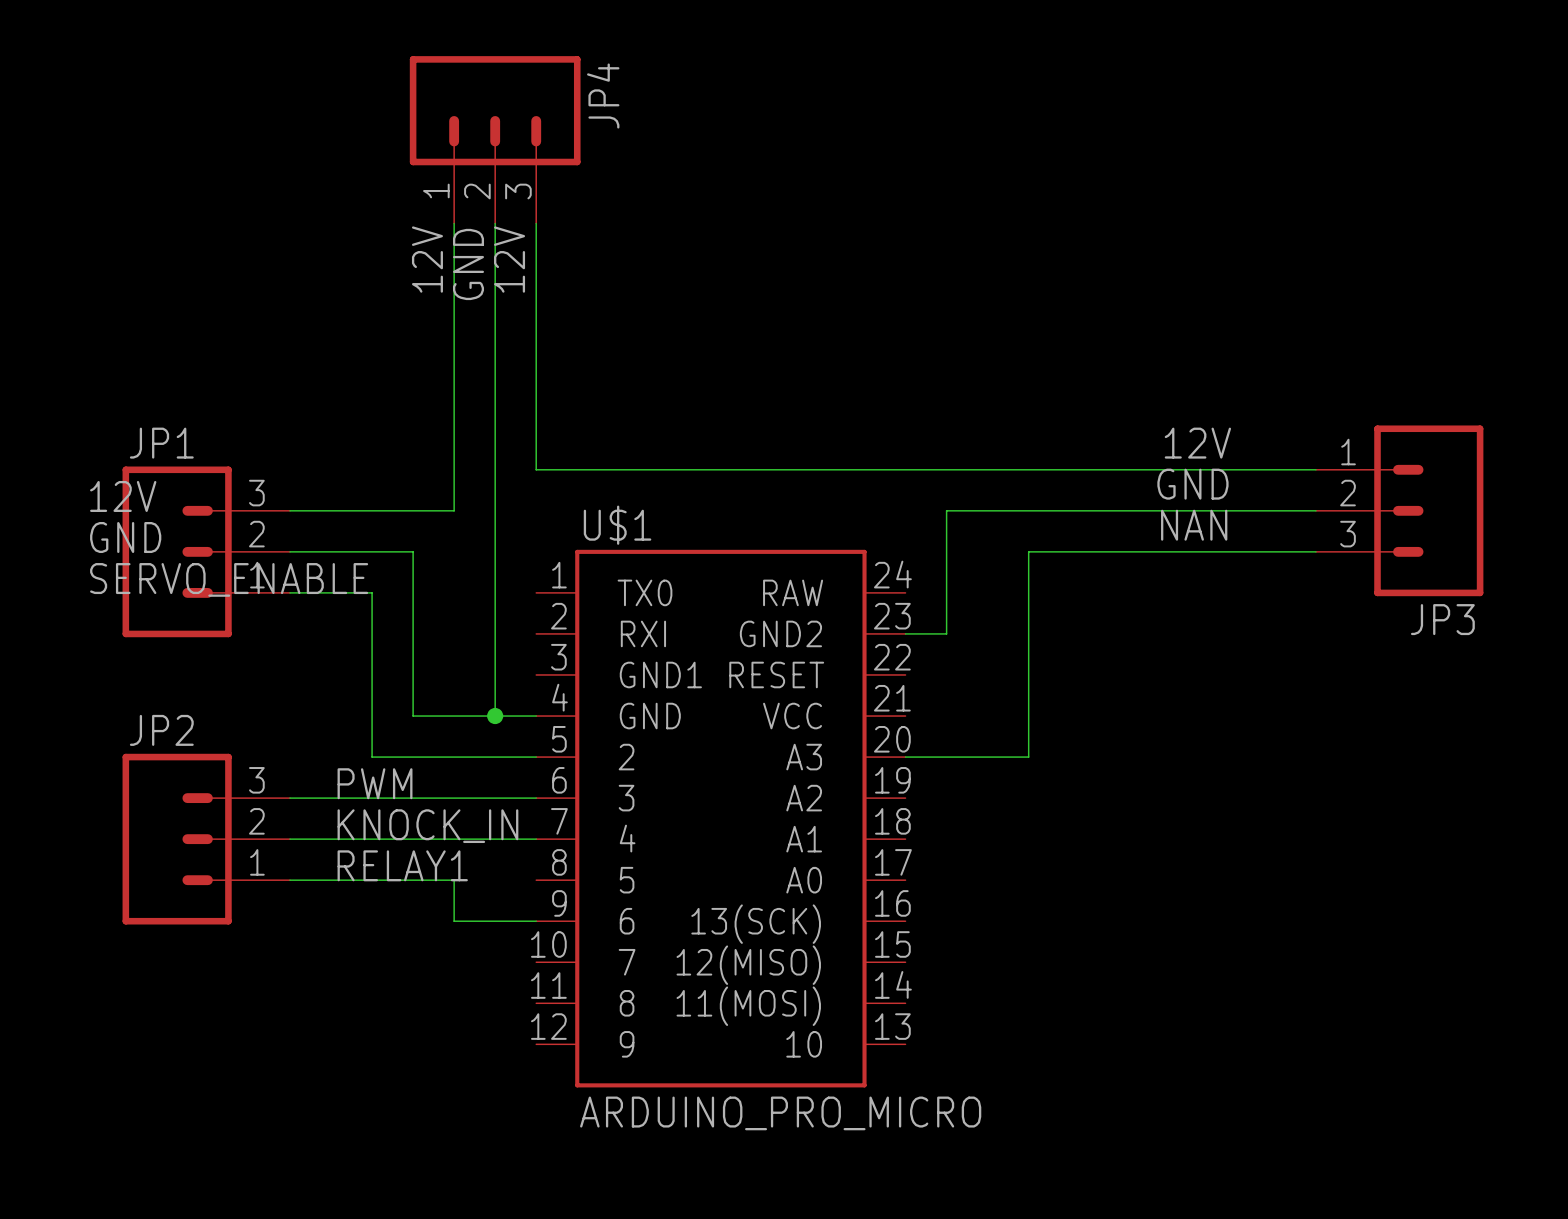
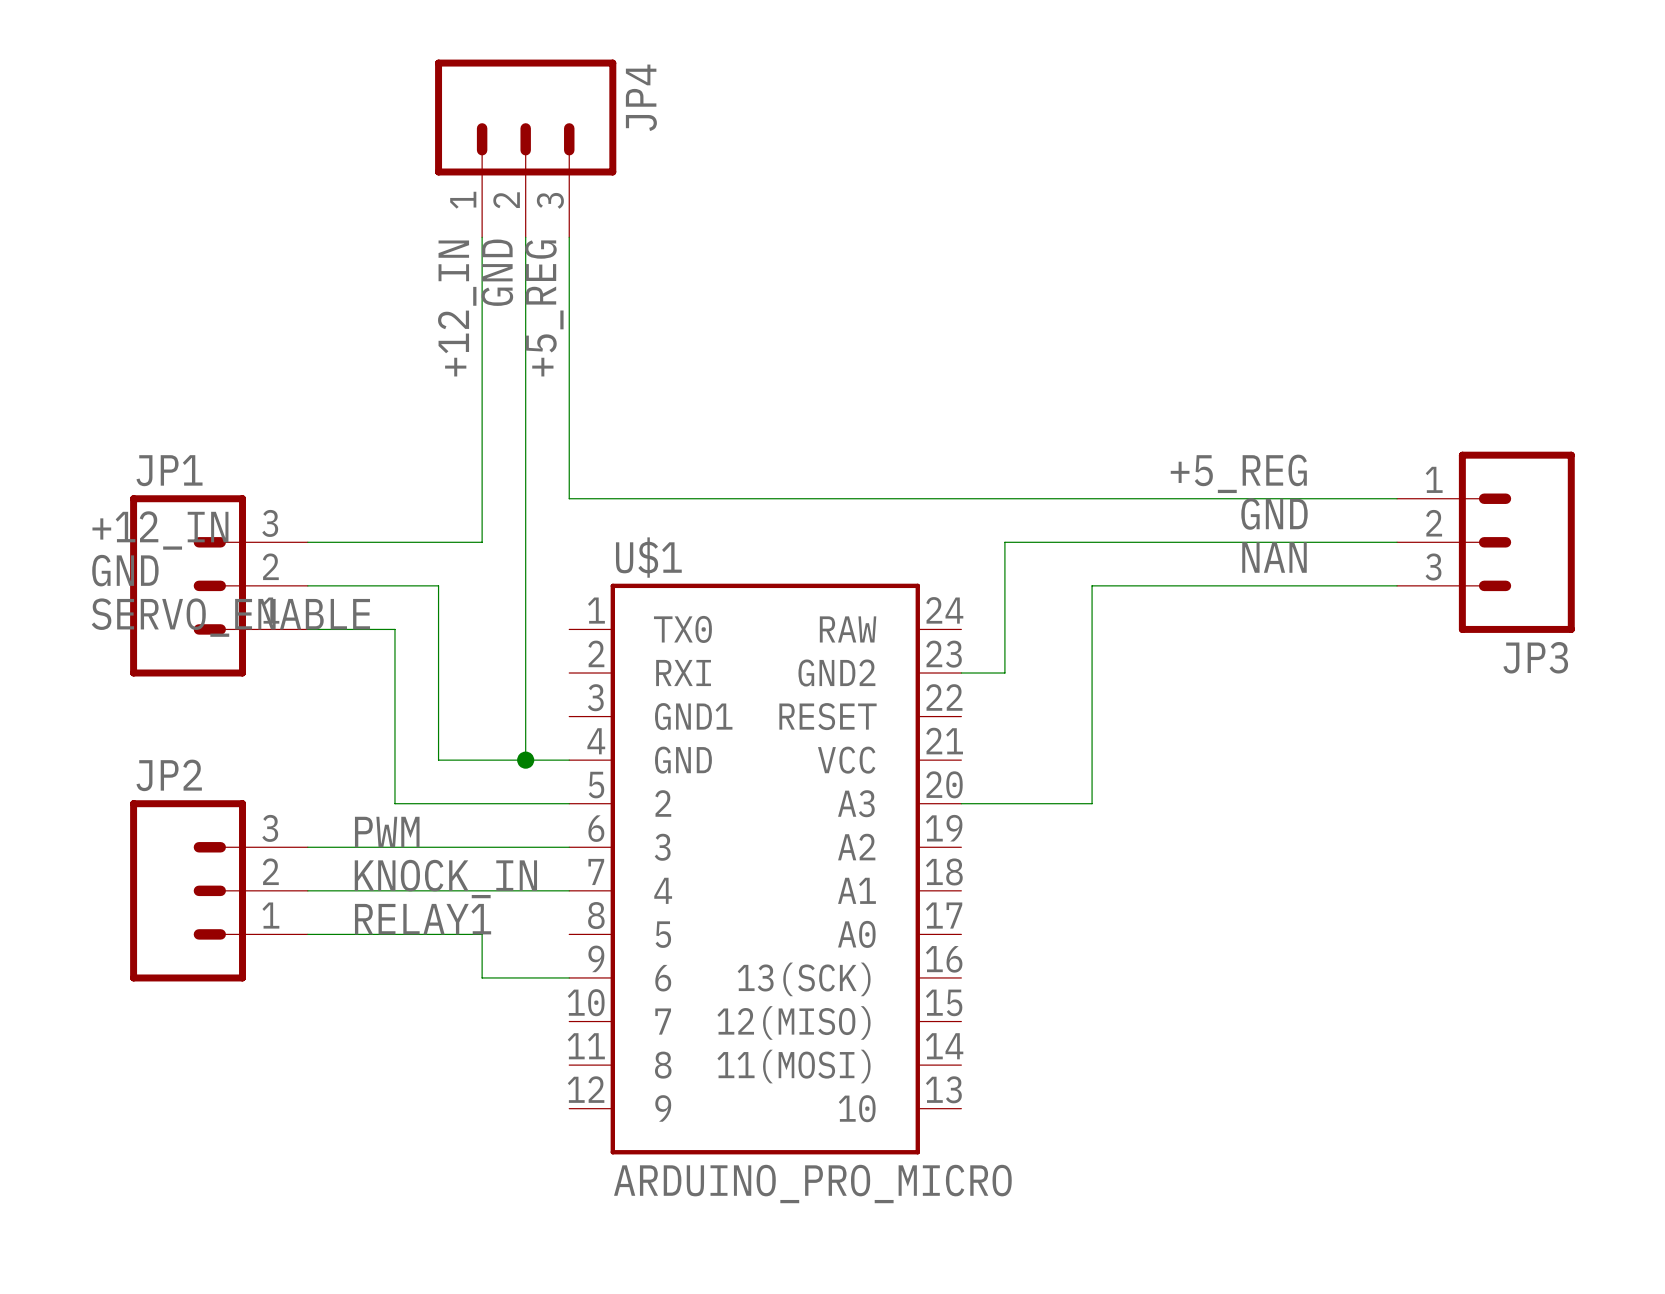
label: 12V (427, 259) -> +12_IN (457, 308)
label: 12V (509, 259) -> +5_REG (544, 308)
label: 12V (1197, 443) -> +5_REG (1238, 473)
label: 12V (123, 496) -> +12_IN (160, 530)

